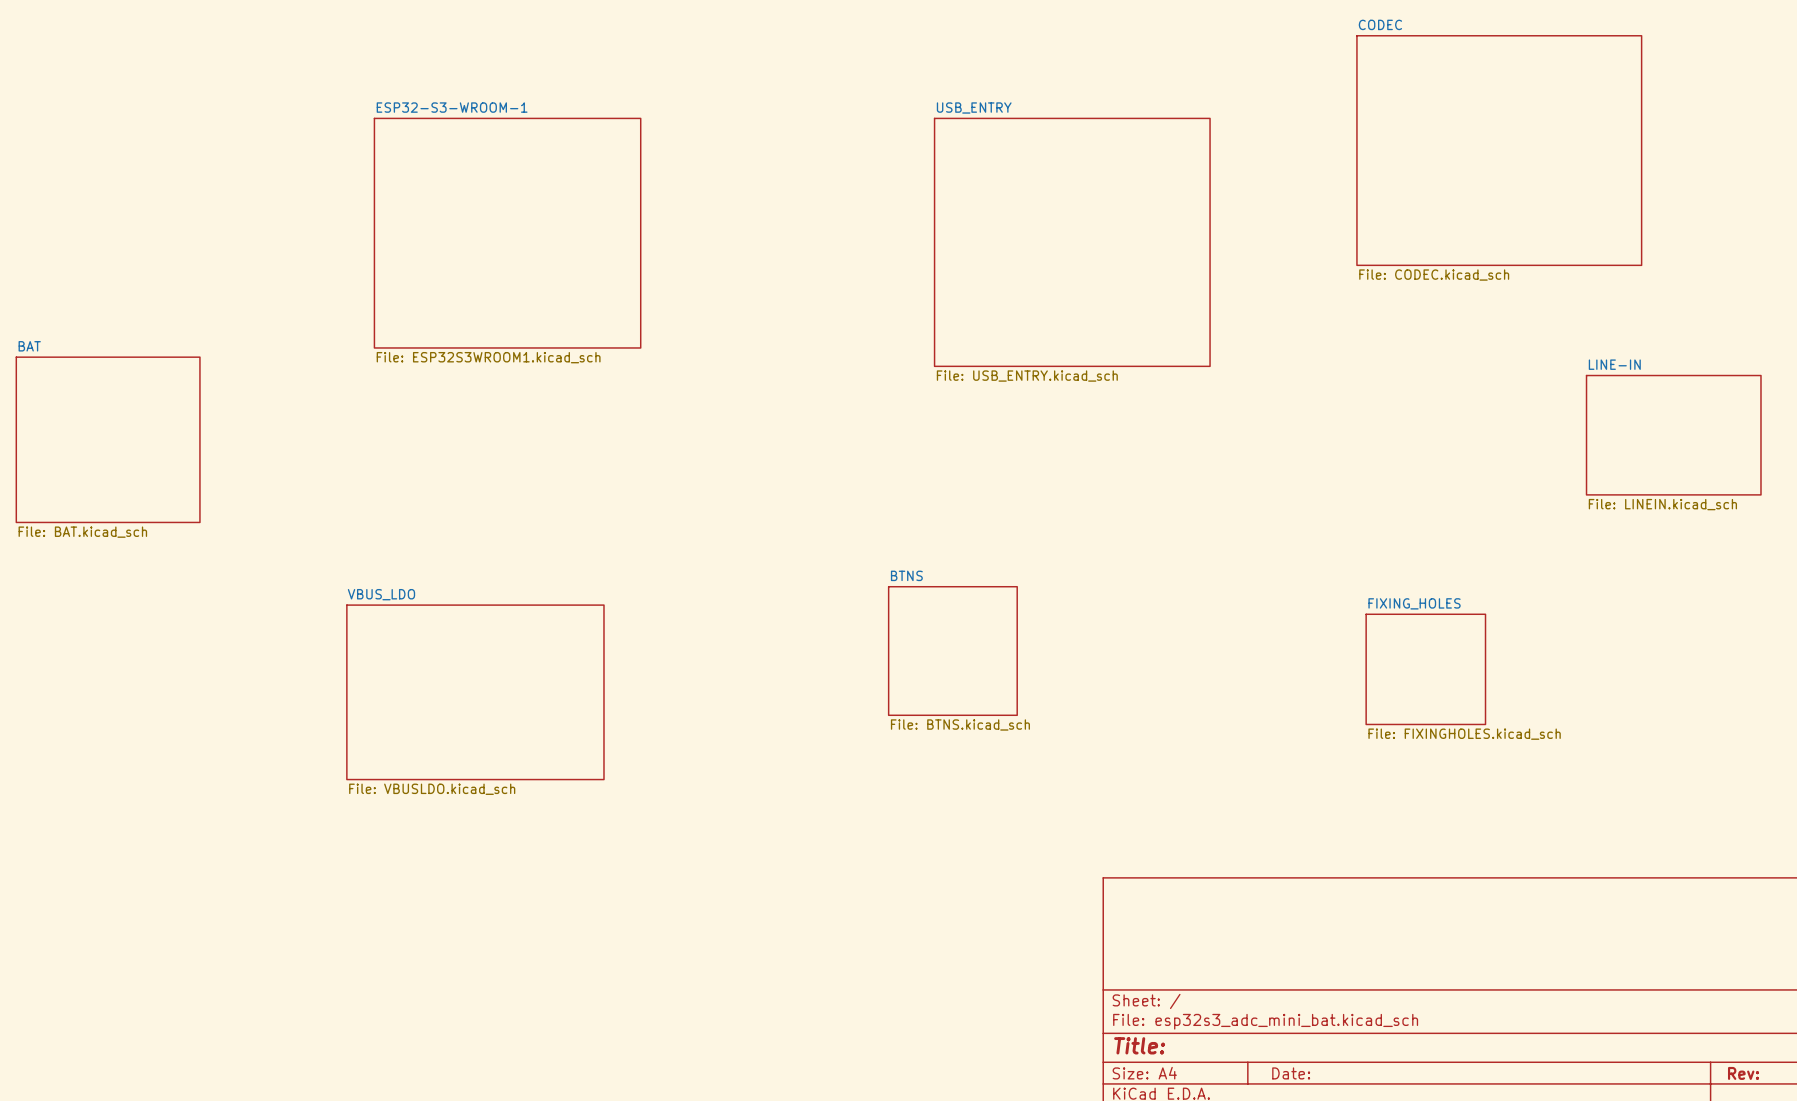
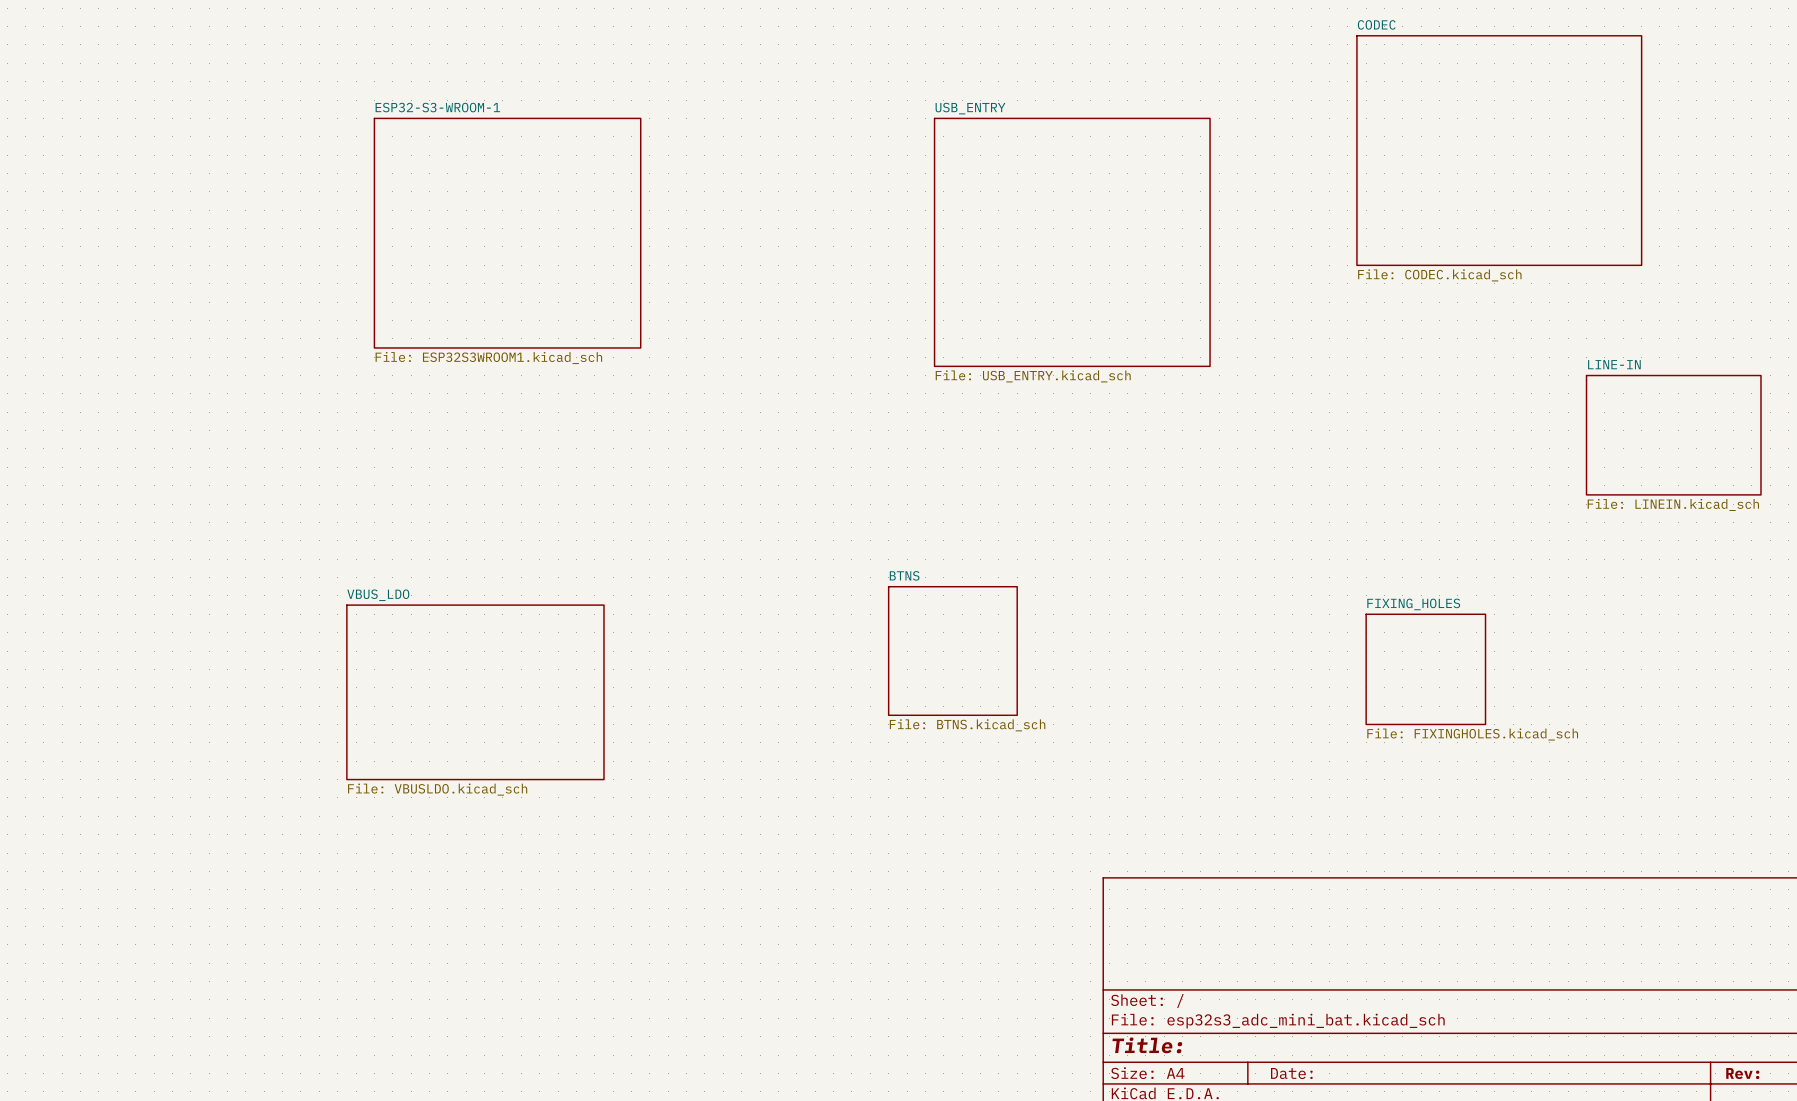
sheet BAT: File: BAT.kicad_sch (108, 439) -> none

